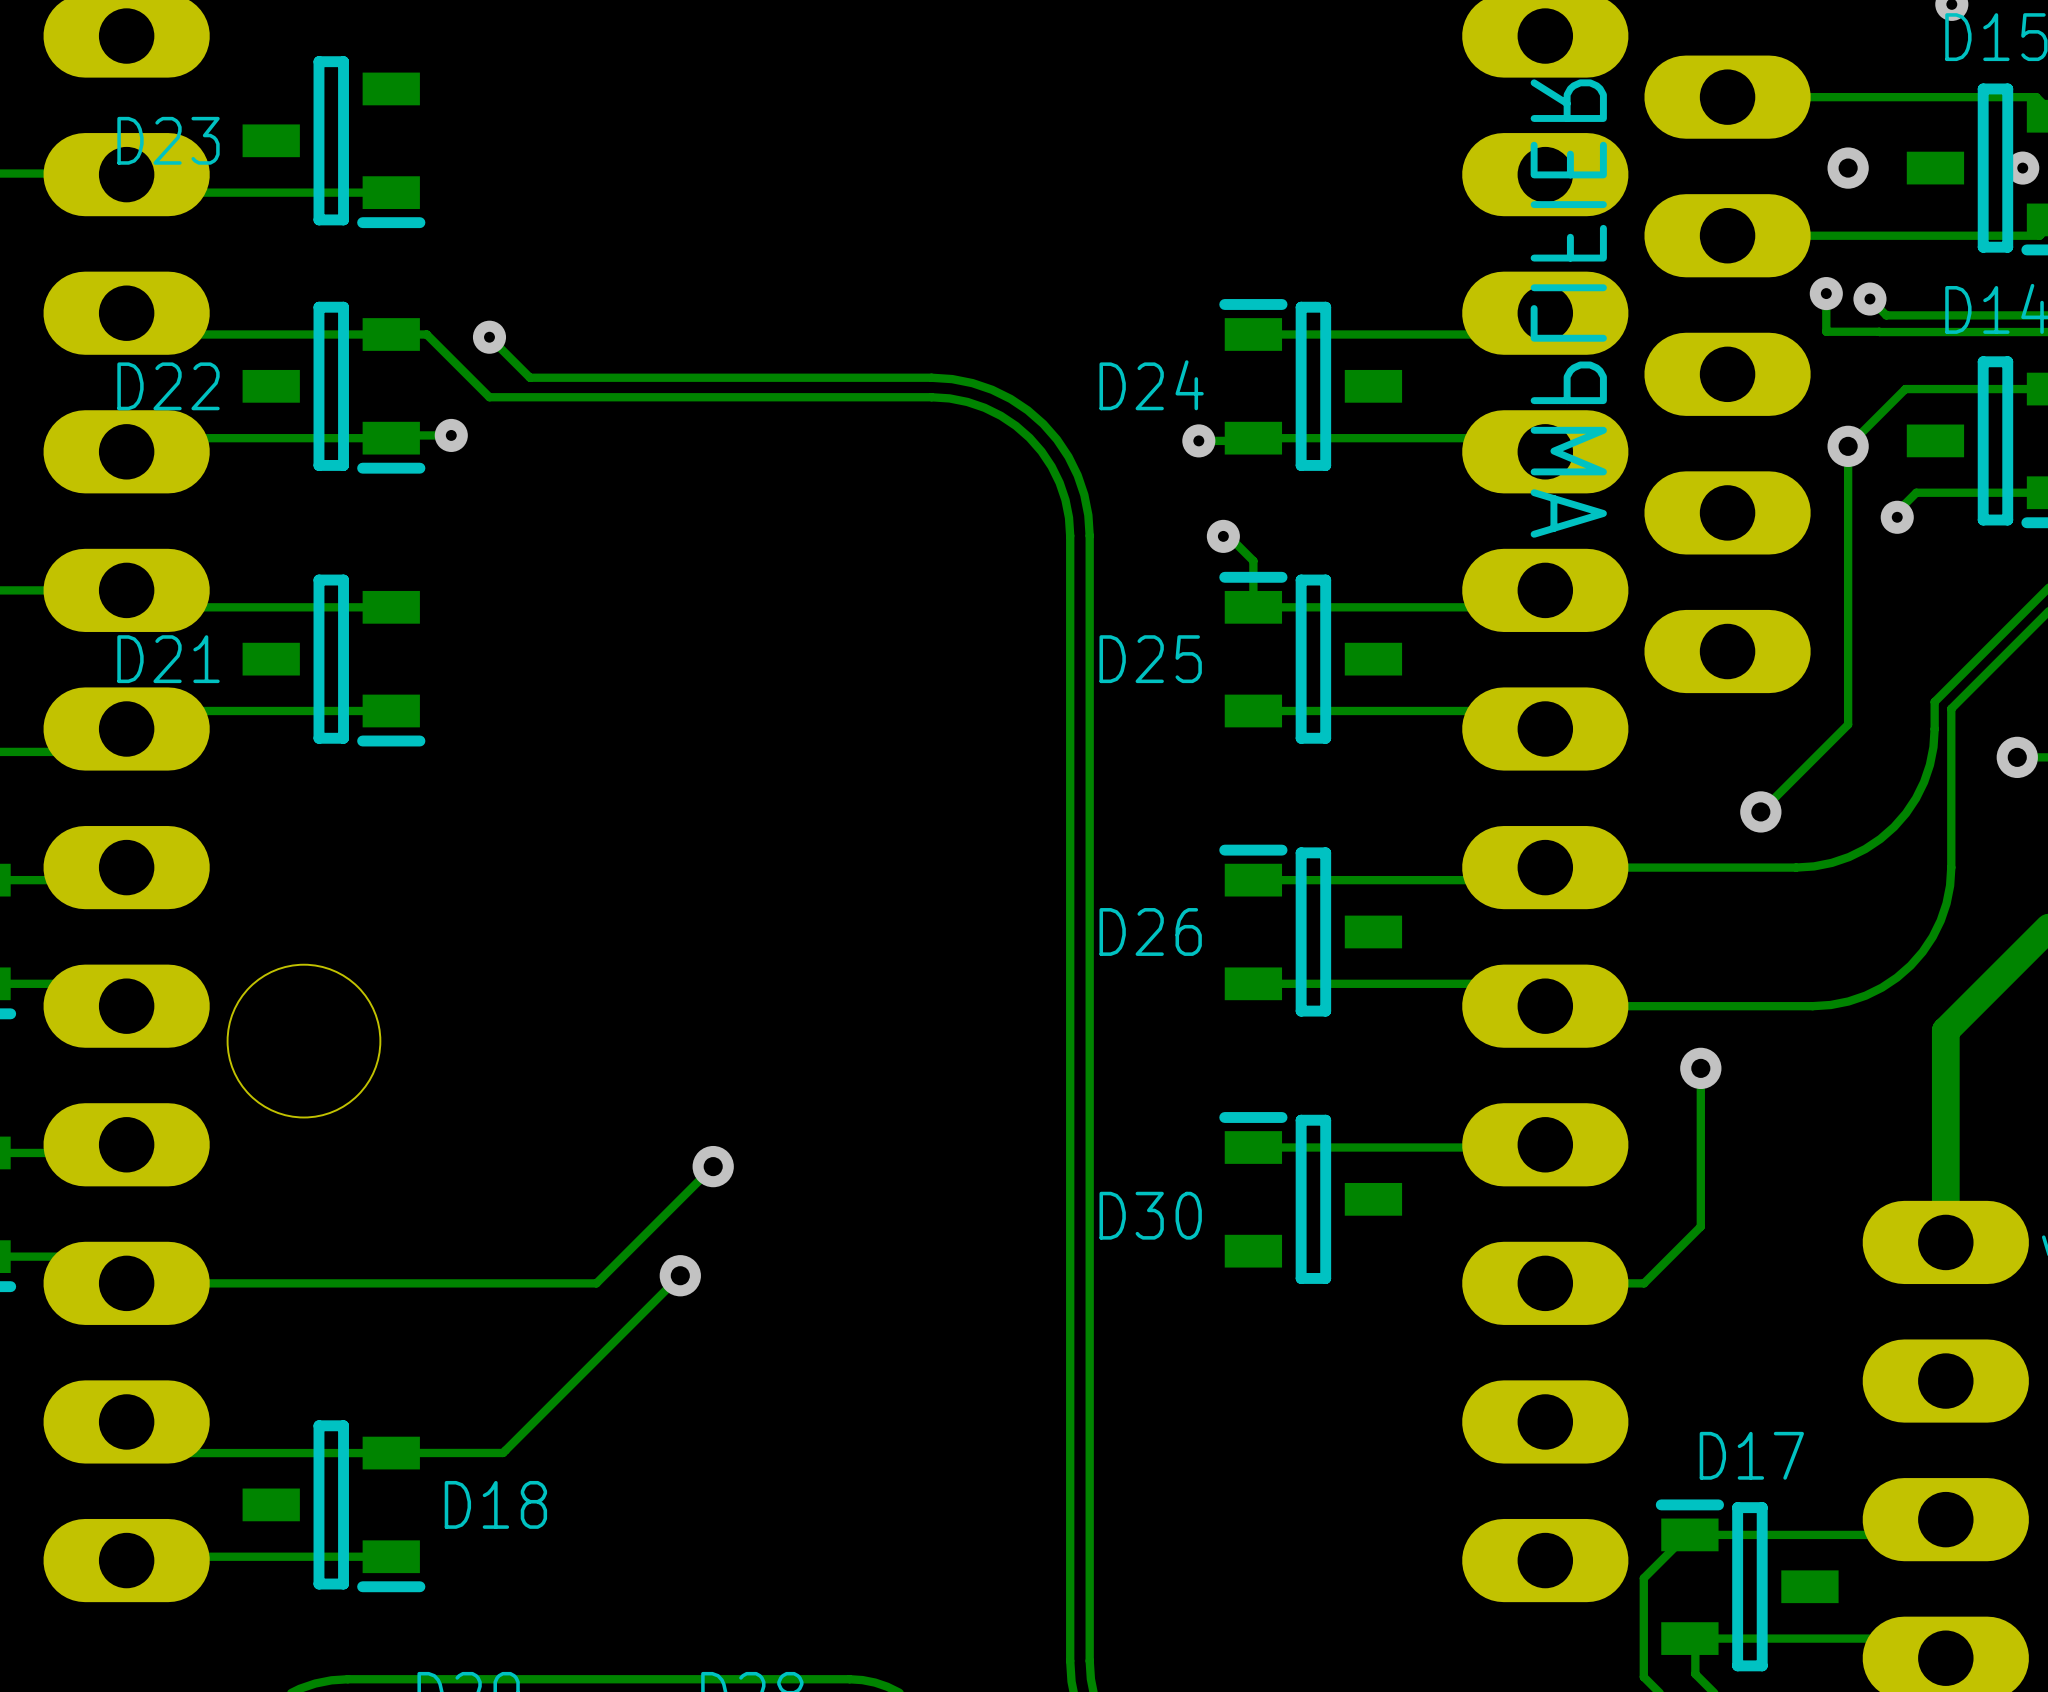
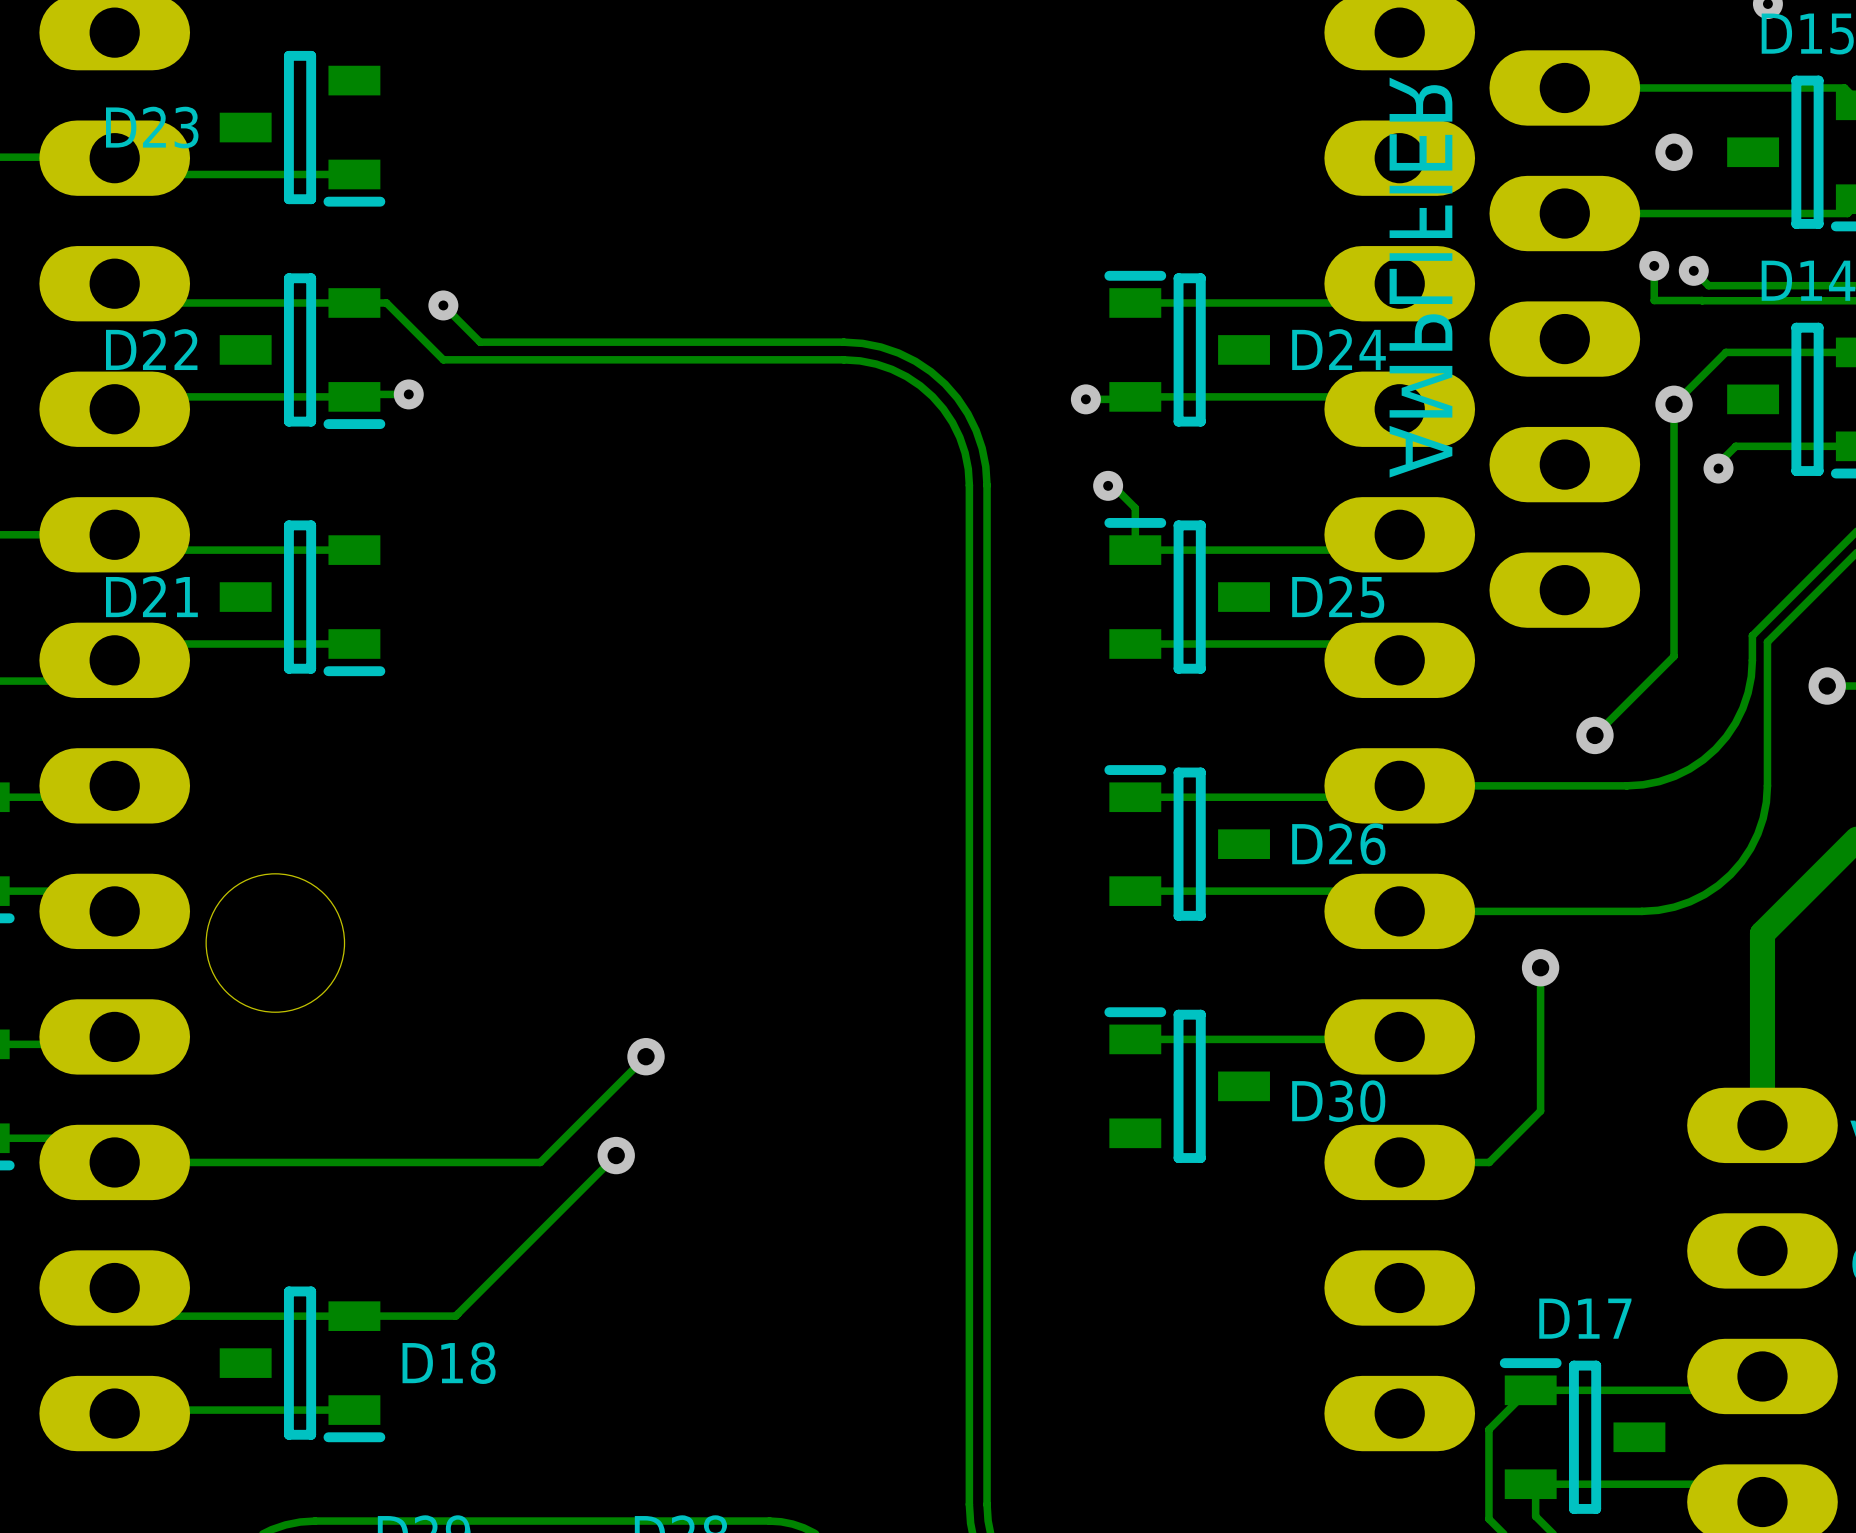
via: (2022, 168) -> none
D24 name position: D24 (1151, 385) -> D24 (1338, 349)
D25 name position: D25 (1150, 659) -> D25 (1338, 597)
D26 name position: D26 (1150, 931) -> D26 (1338, 844)
D30 name position: D30 (1150, 1215) -> D30 (1338, 1101)

